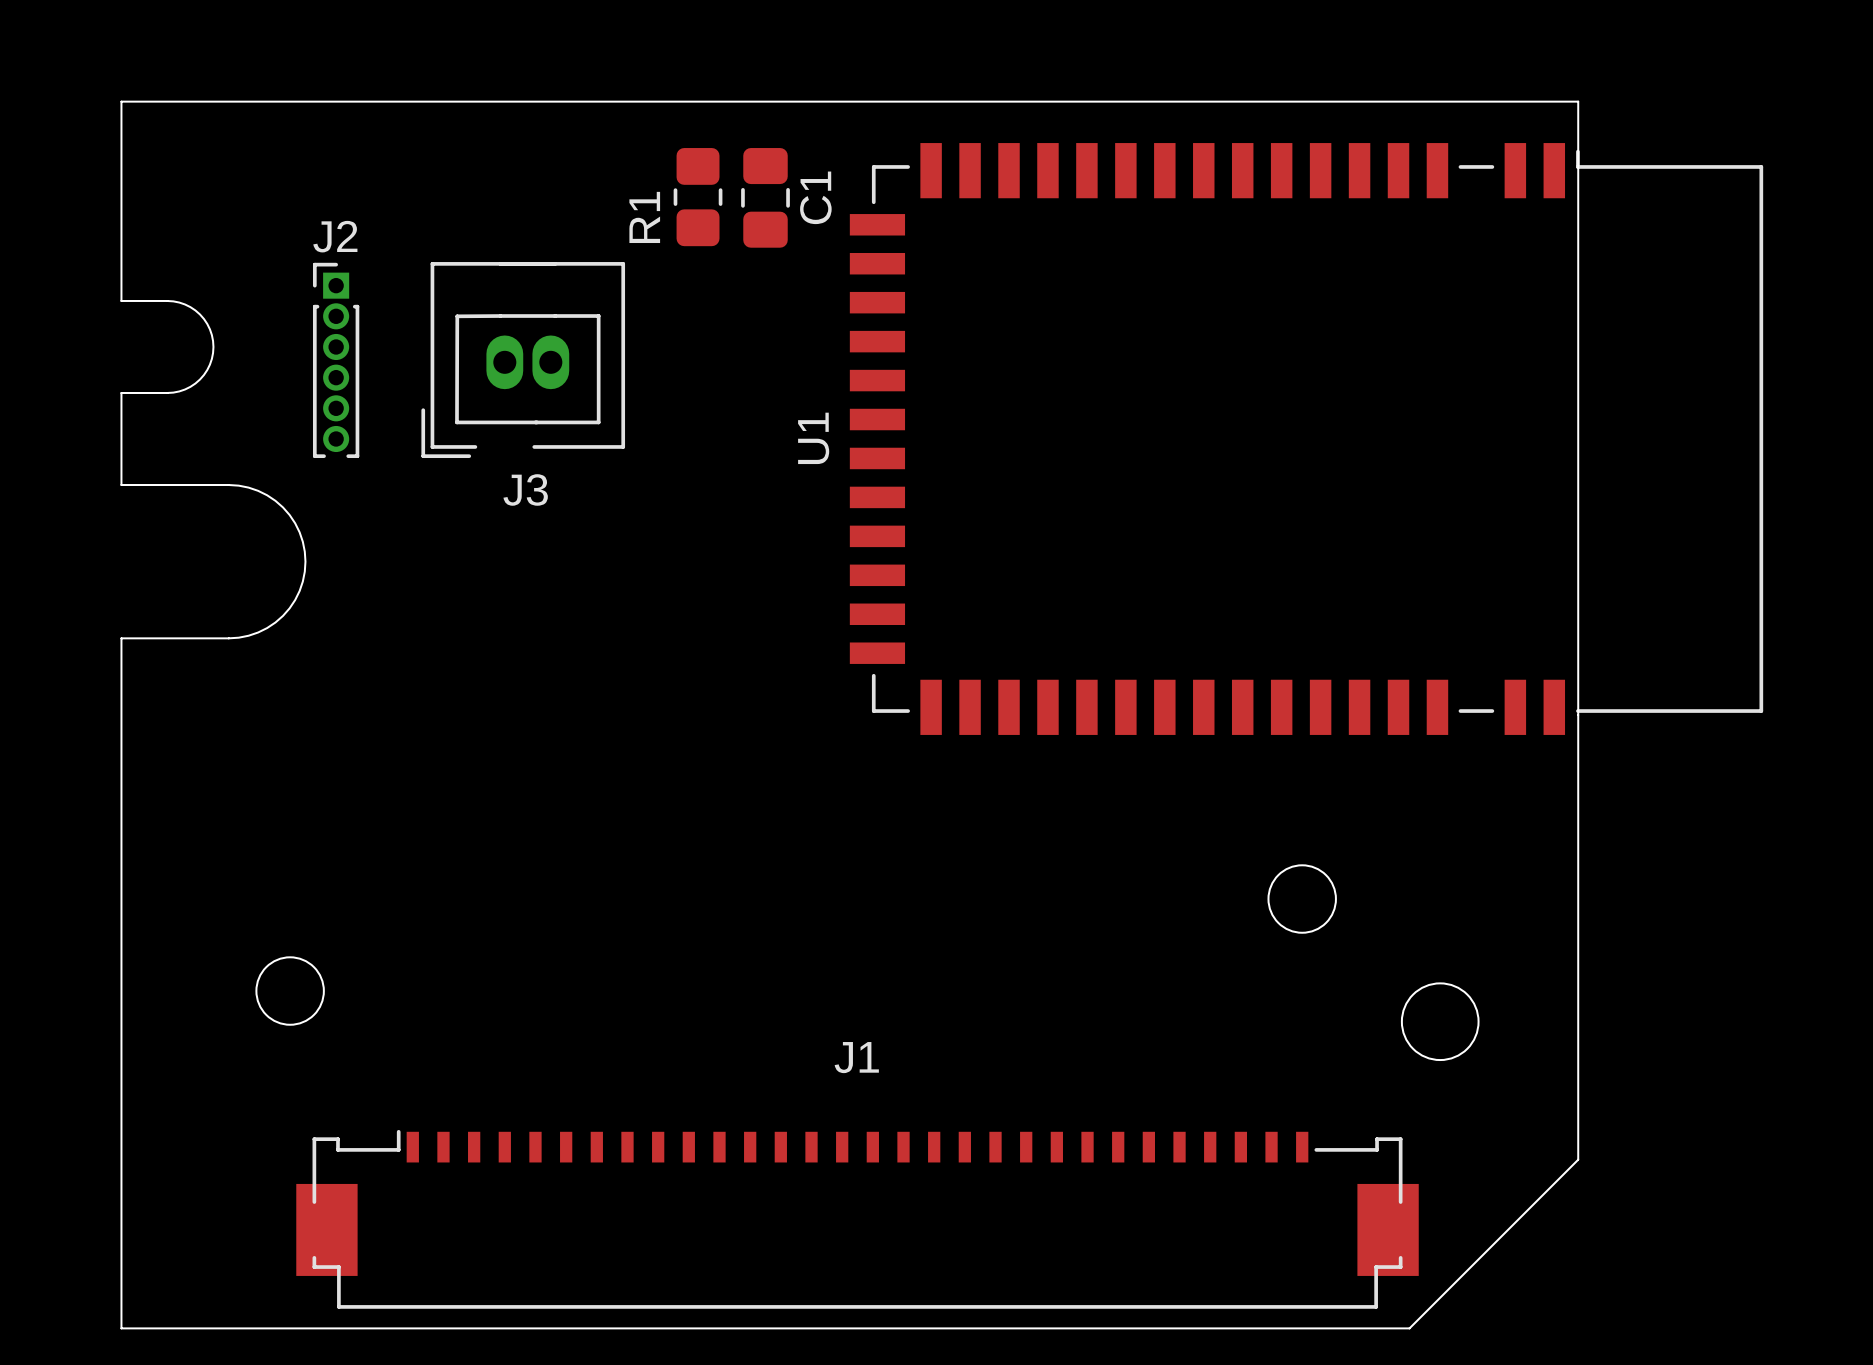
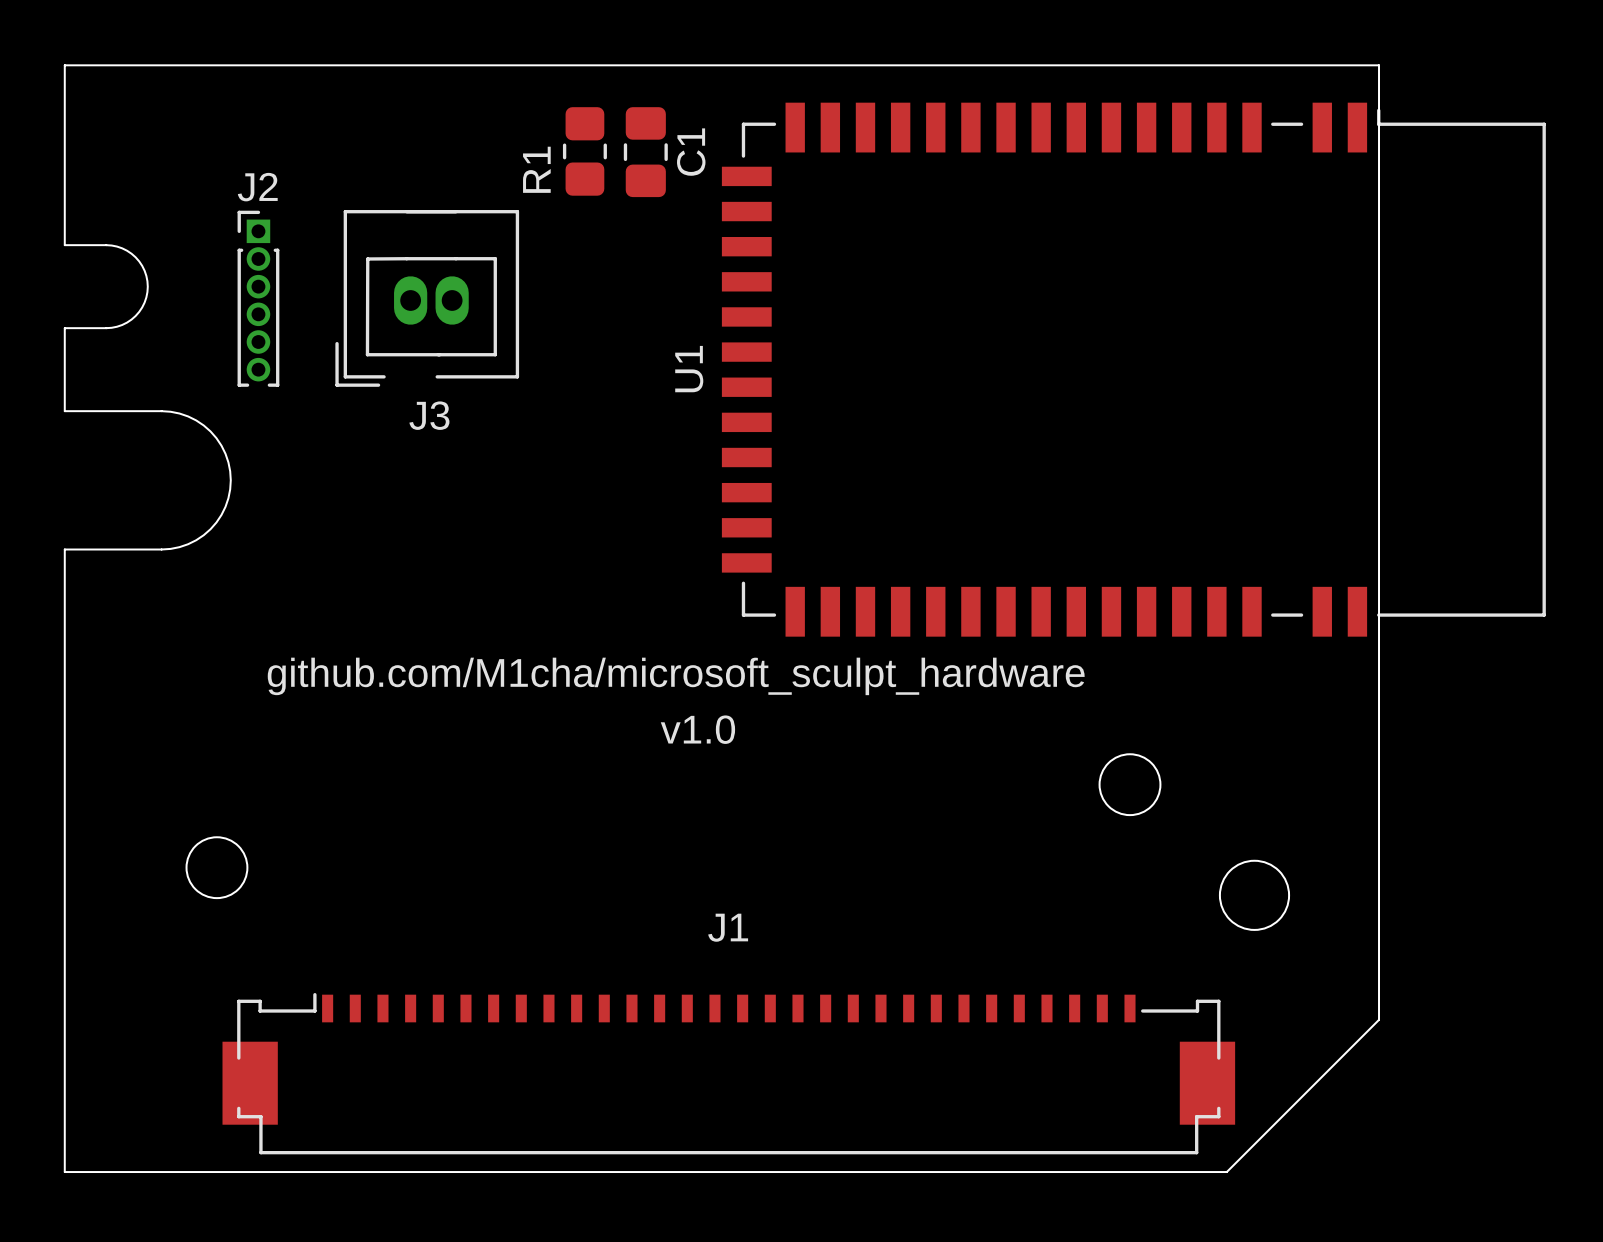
text: none -> github.com/M1cha/microsoft_sculpt_hardware (676, 676)
text: none -> v1.0 (697, 729)

